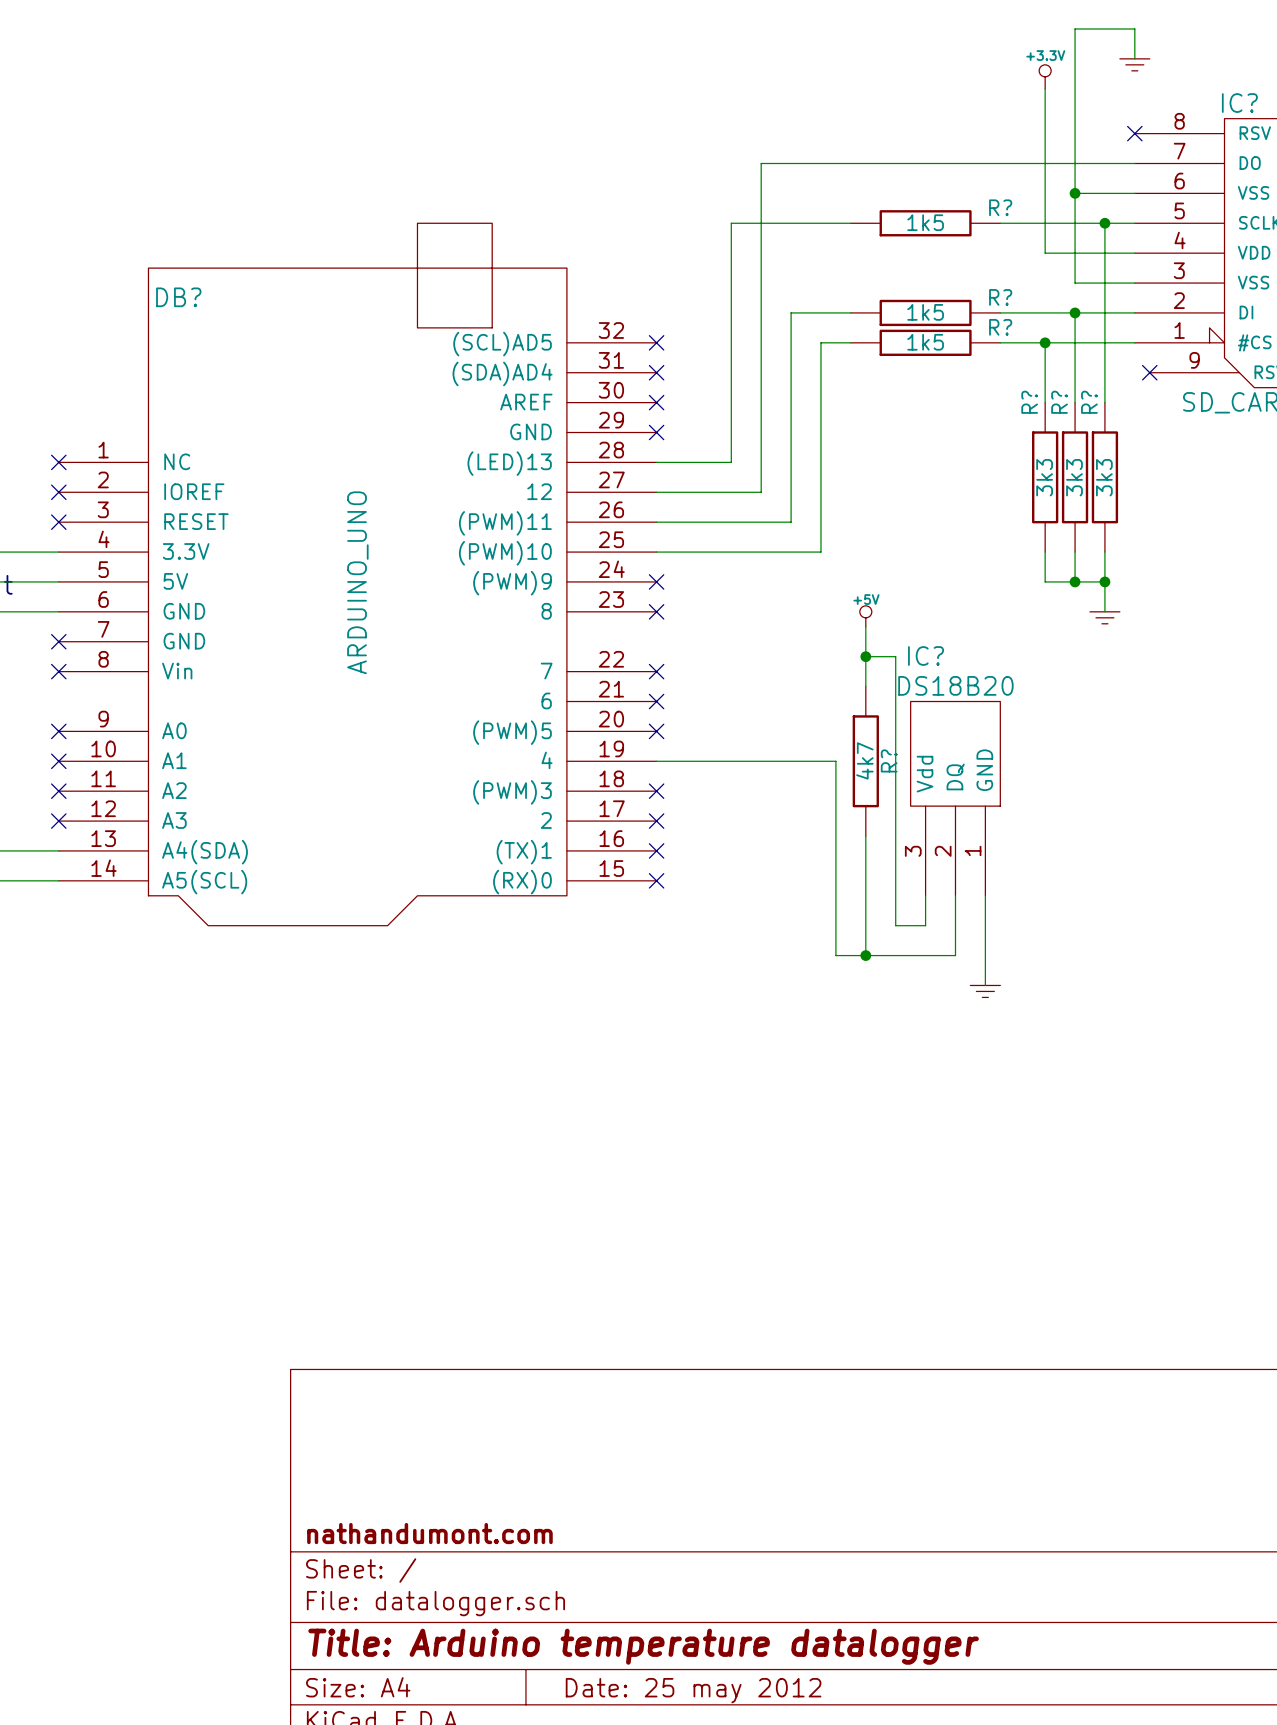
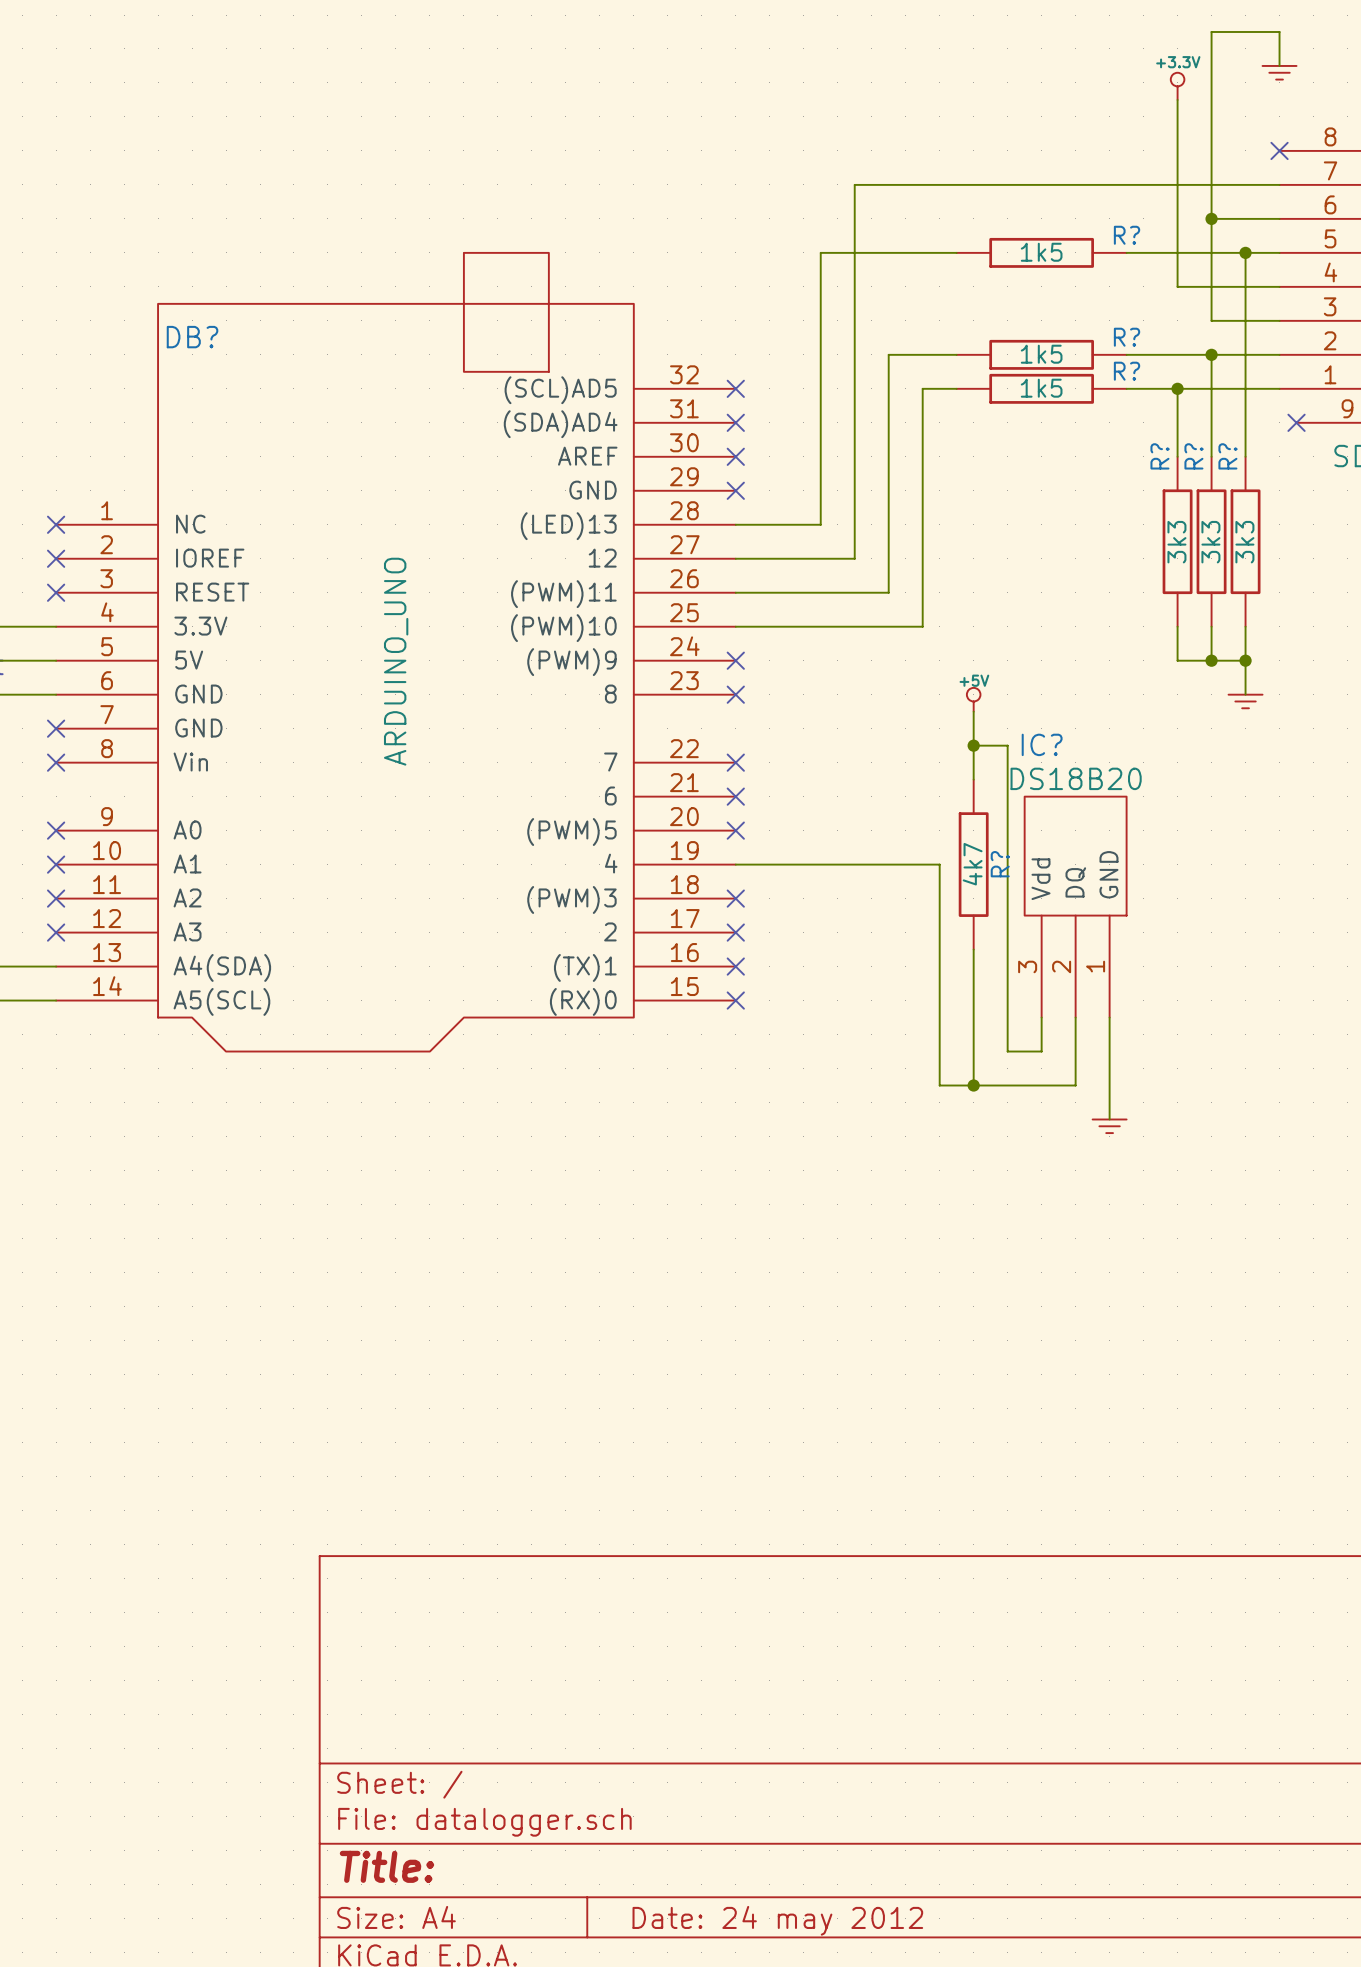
title block: nathandumont.com (429, 1533) -> none
title block: Title: Arduino temperature datalogger (643, 1646) -> Title: (386, 1866)
title block: Date: 25 may 2012 (693, 1690) -> Date: 24 may 2012 (777, 1920)

